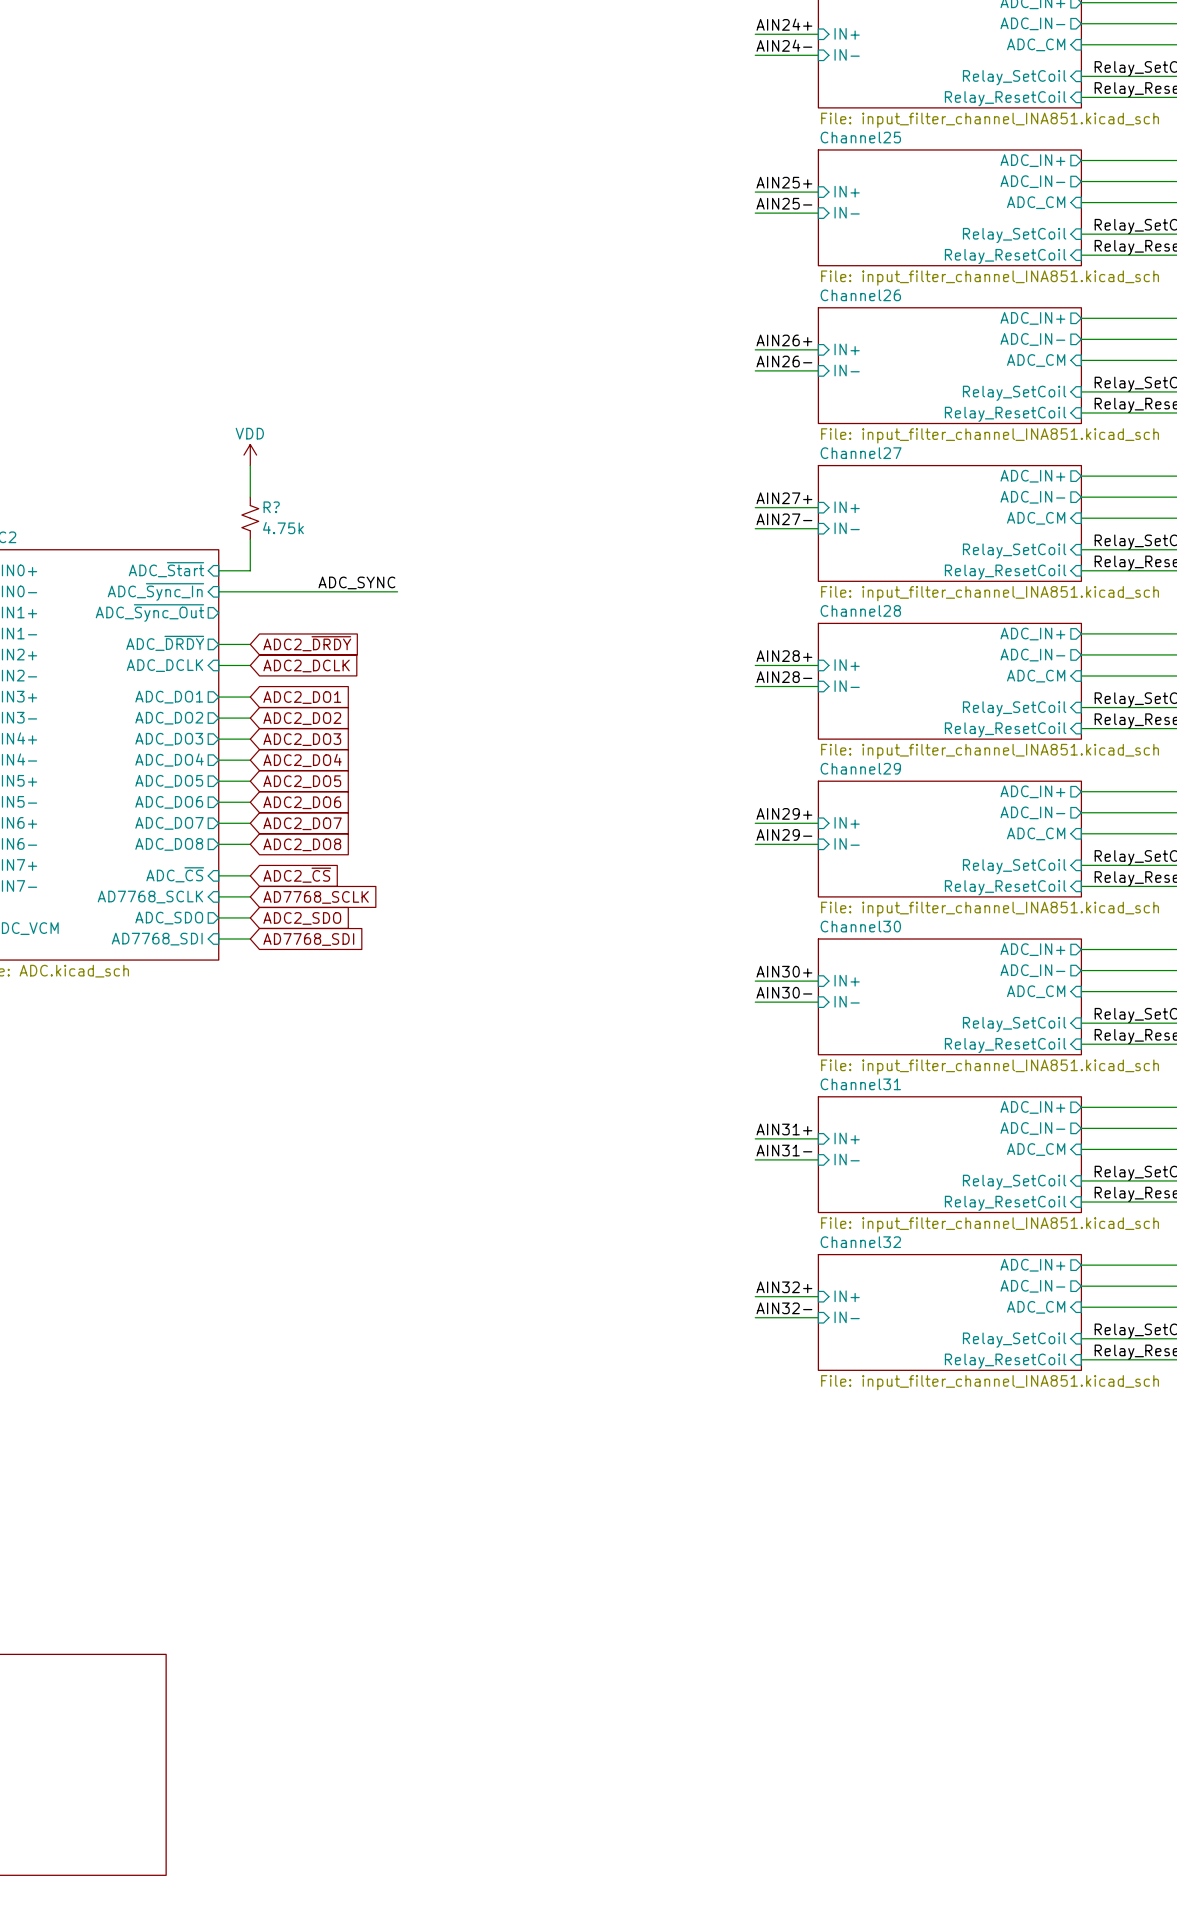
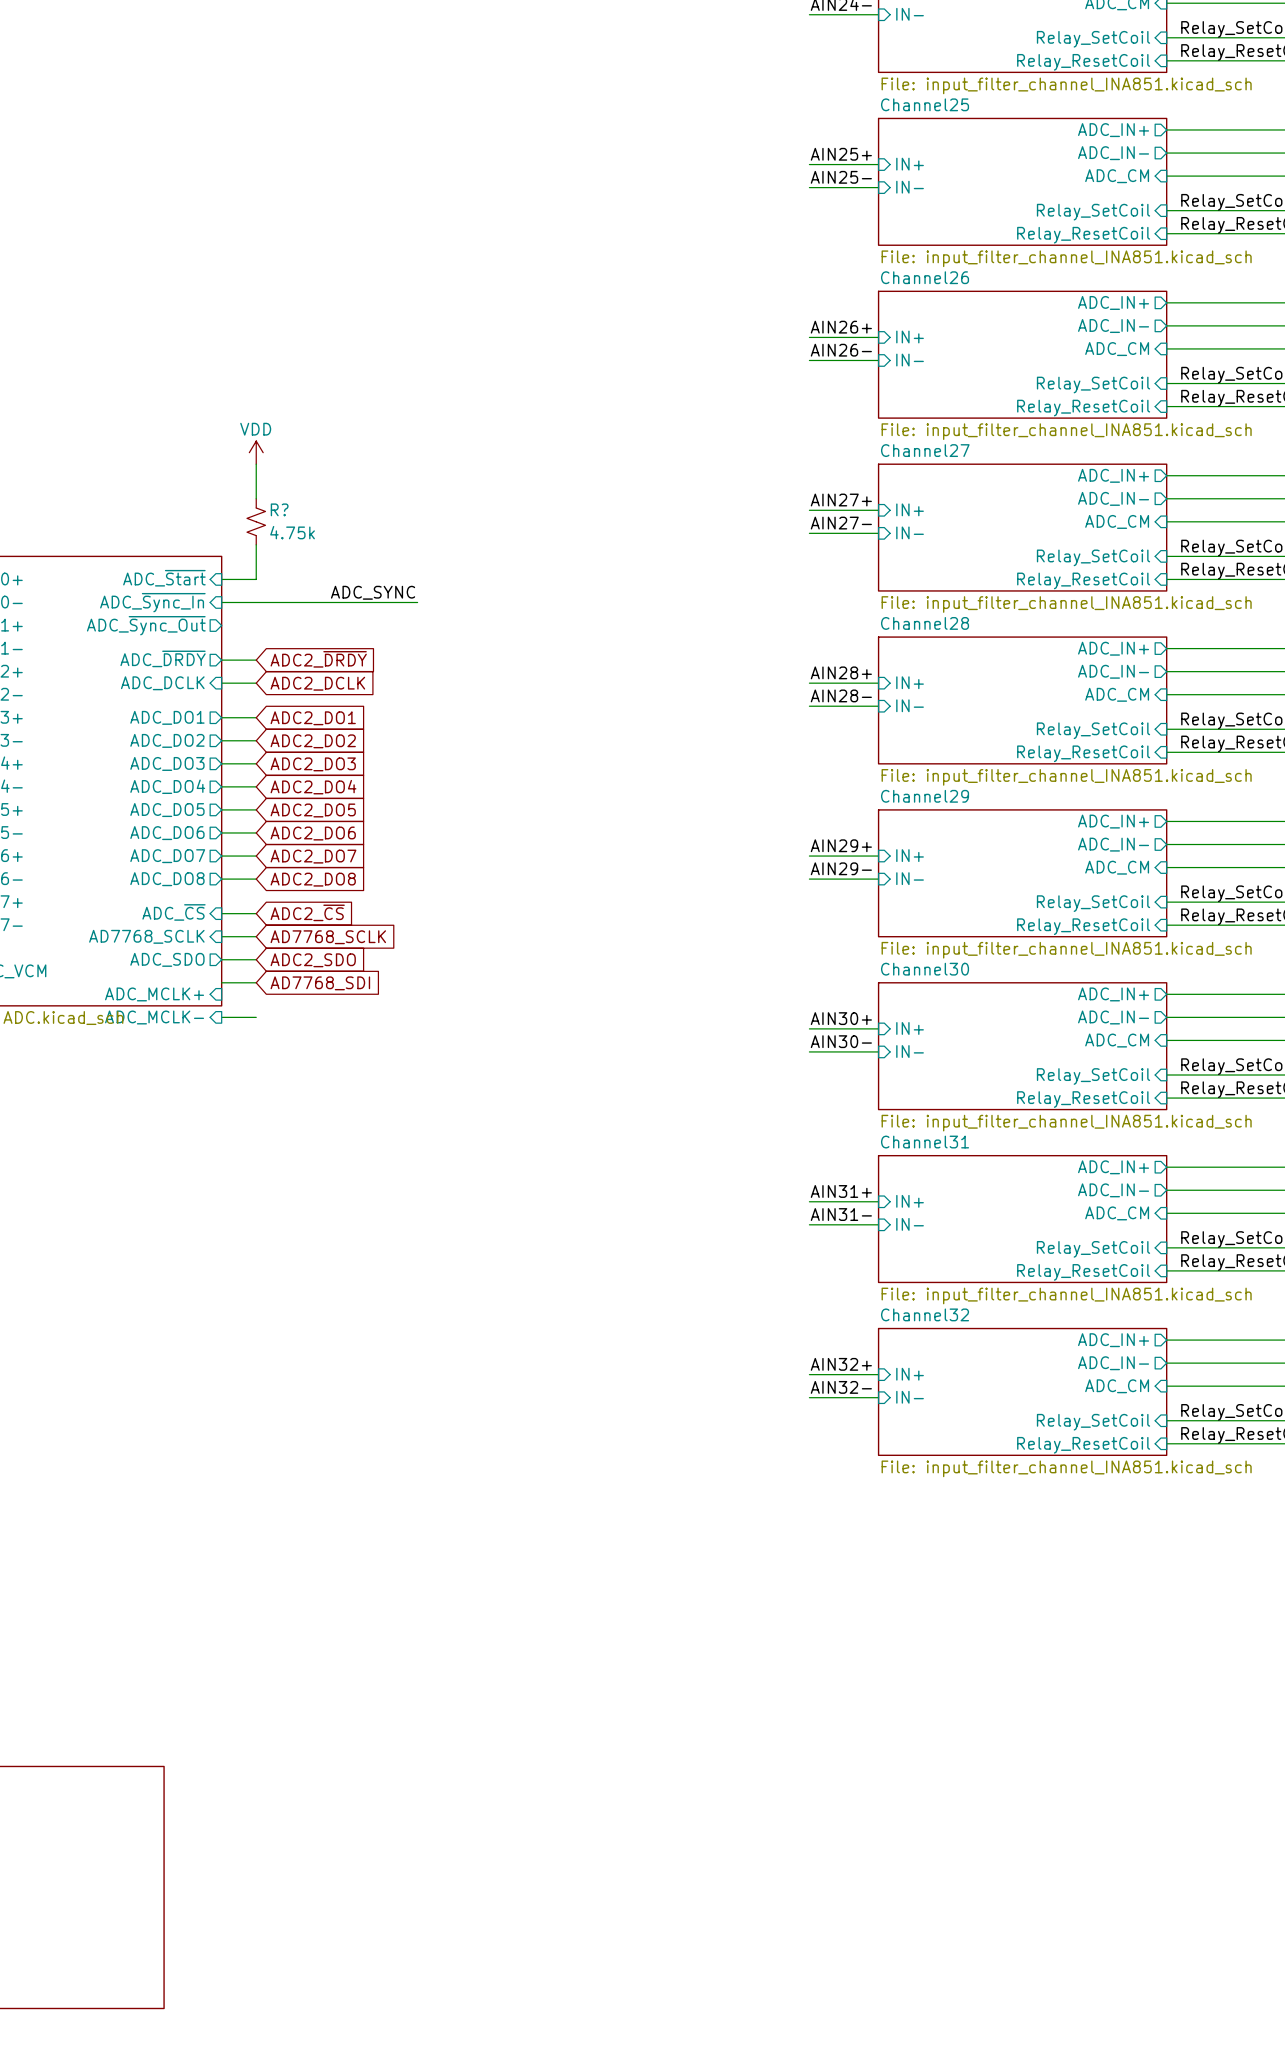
sheet pin: AD7768_SDI (157, 939) -> none
sheet pin: none -> ADC_MCLK+ (154, 994)
sheet pin: none -> ADC_MCLK- (154, 1017)
wire: none -> (221, 1017) (256, 1017)

